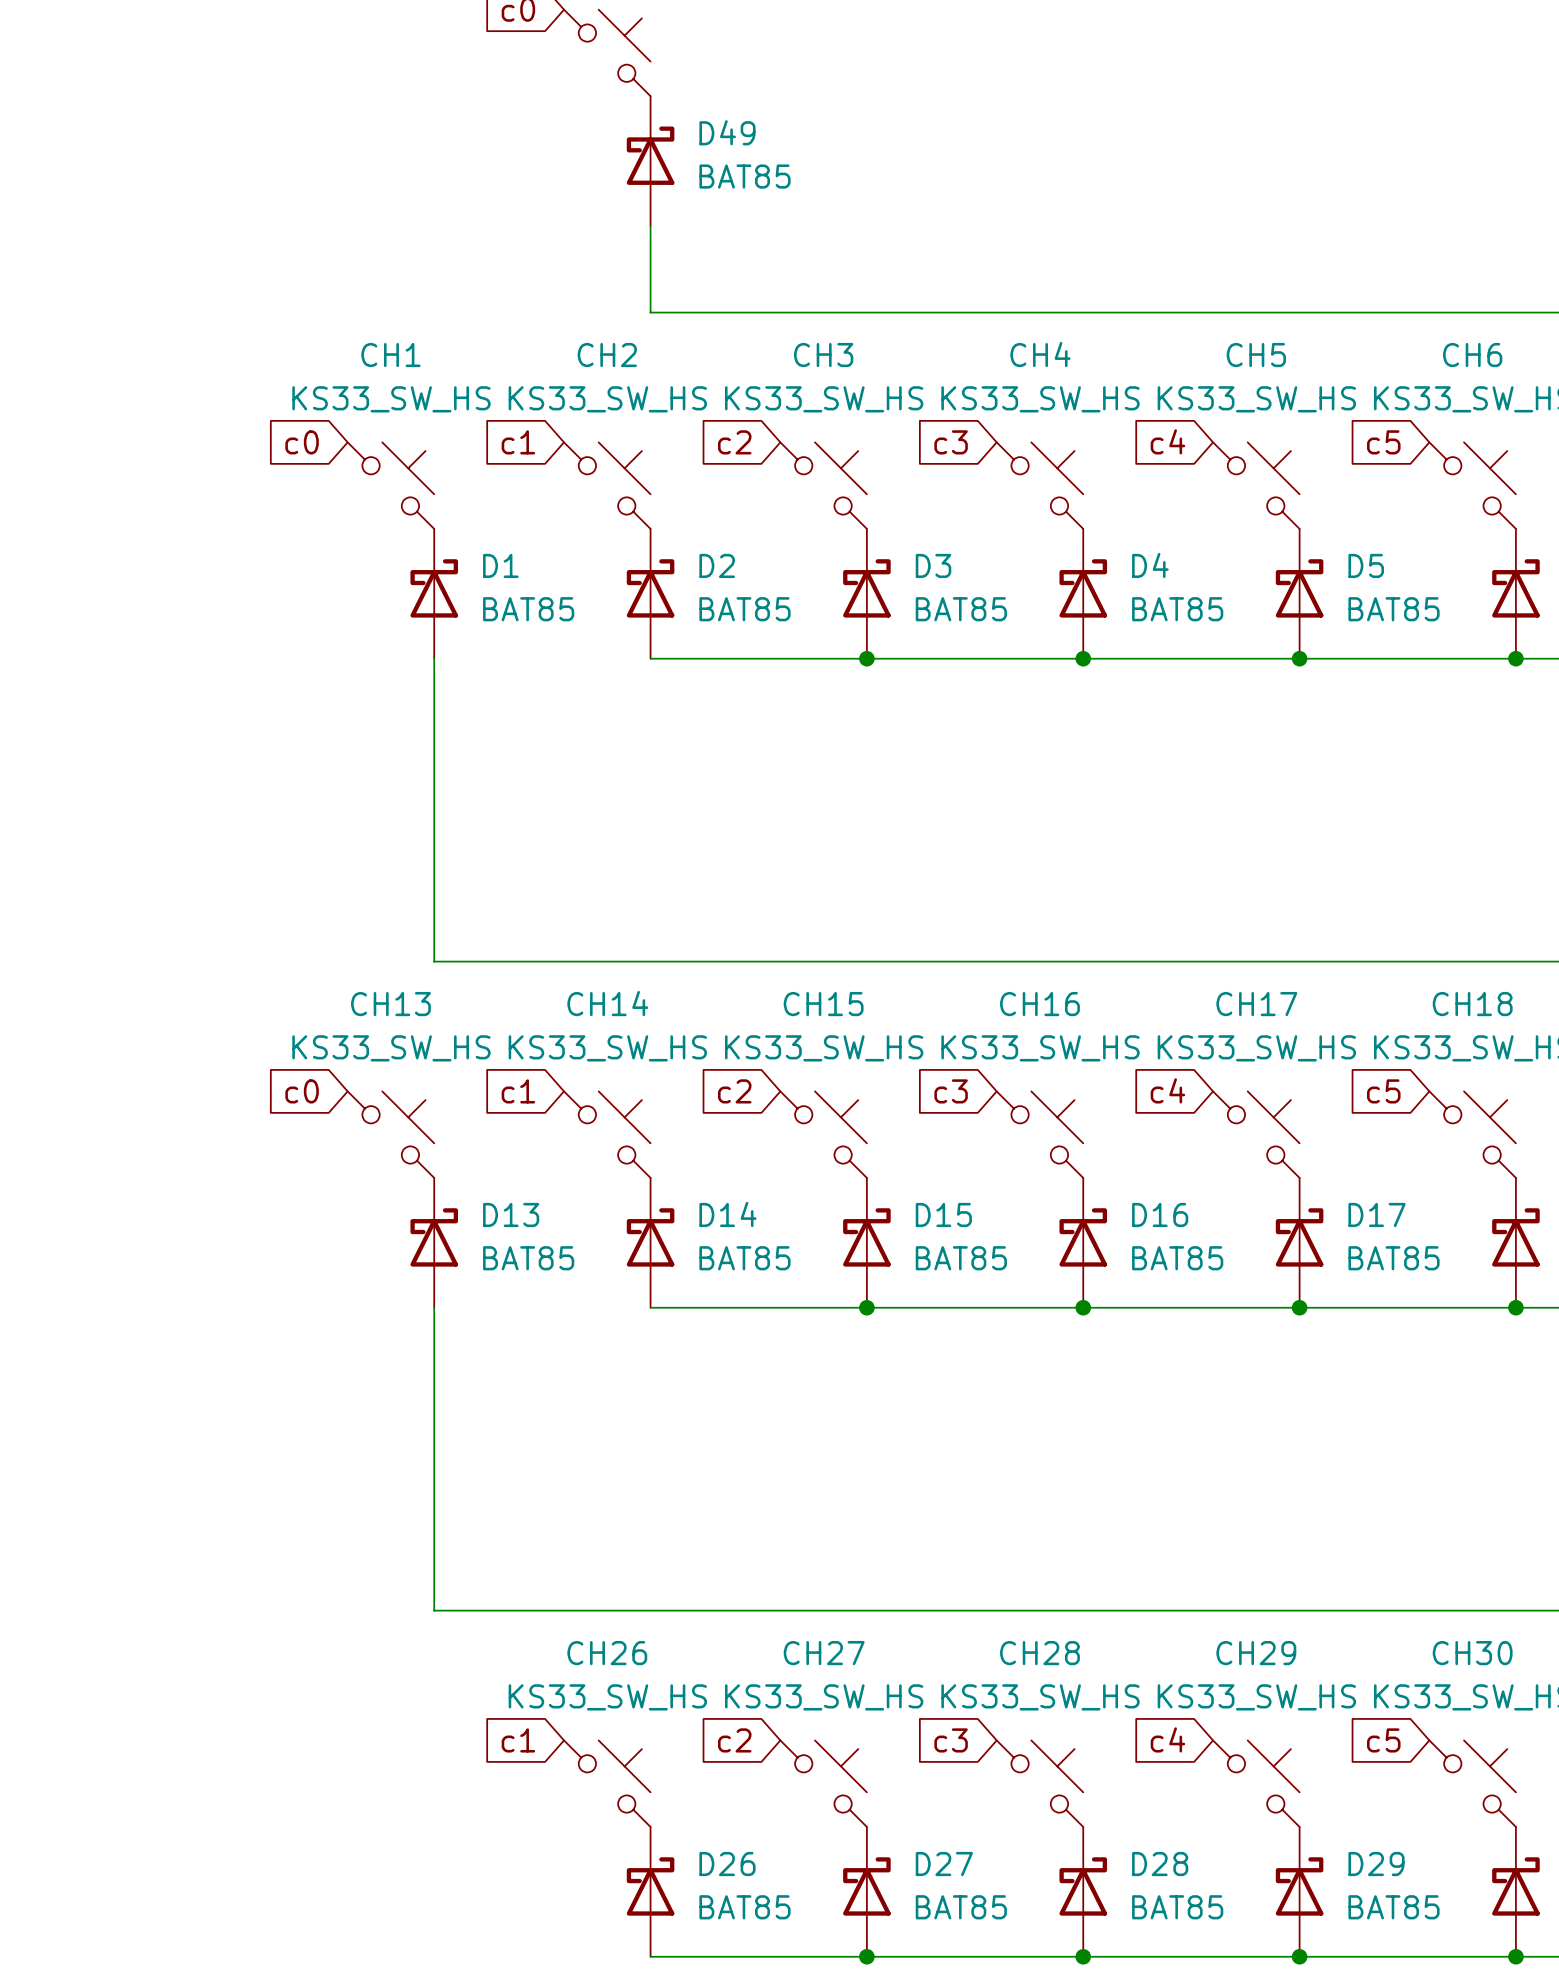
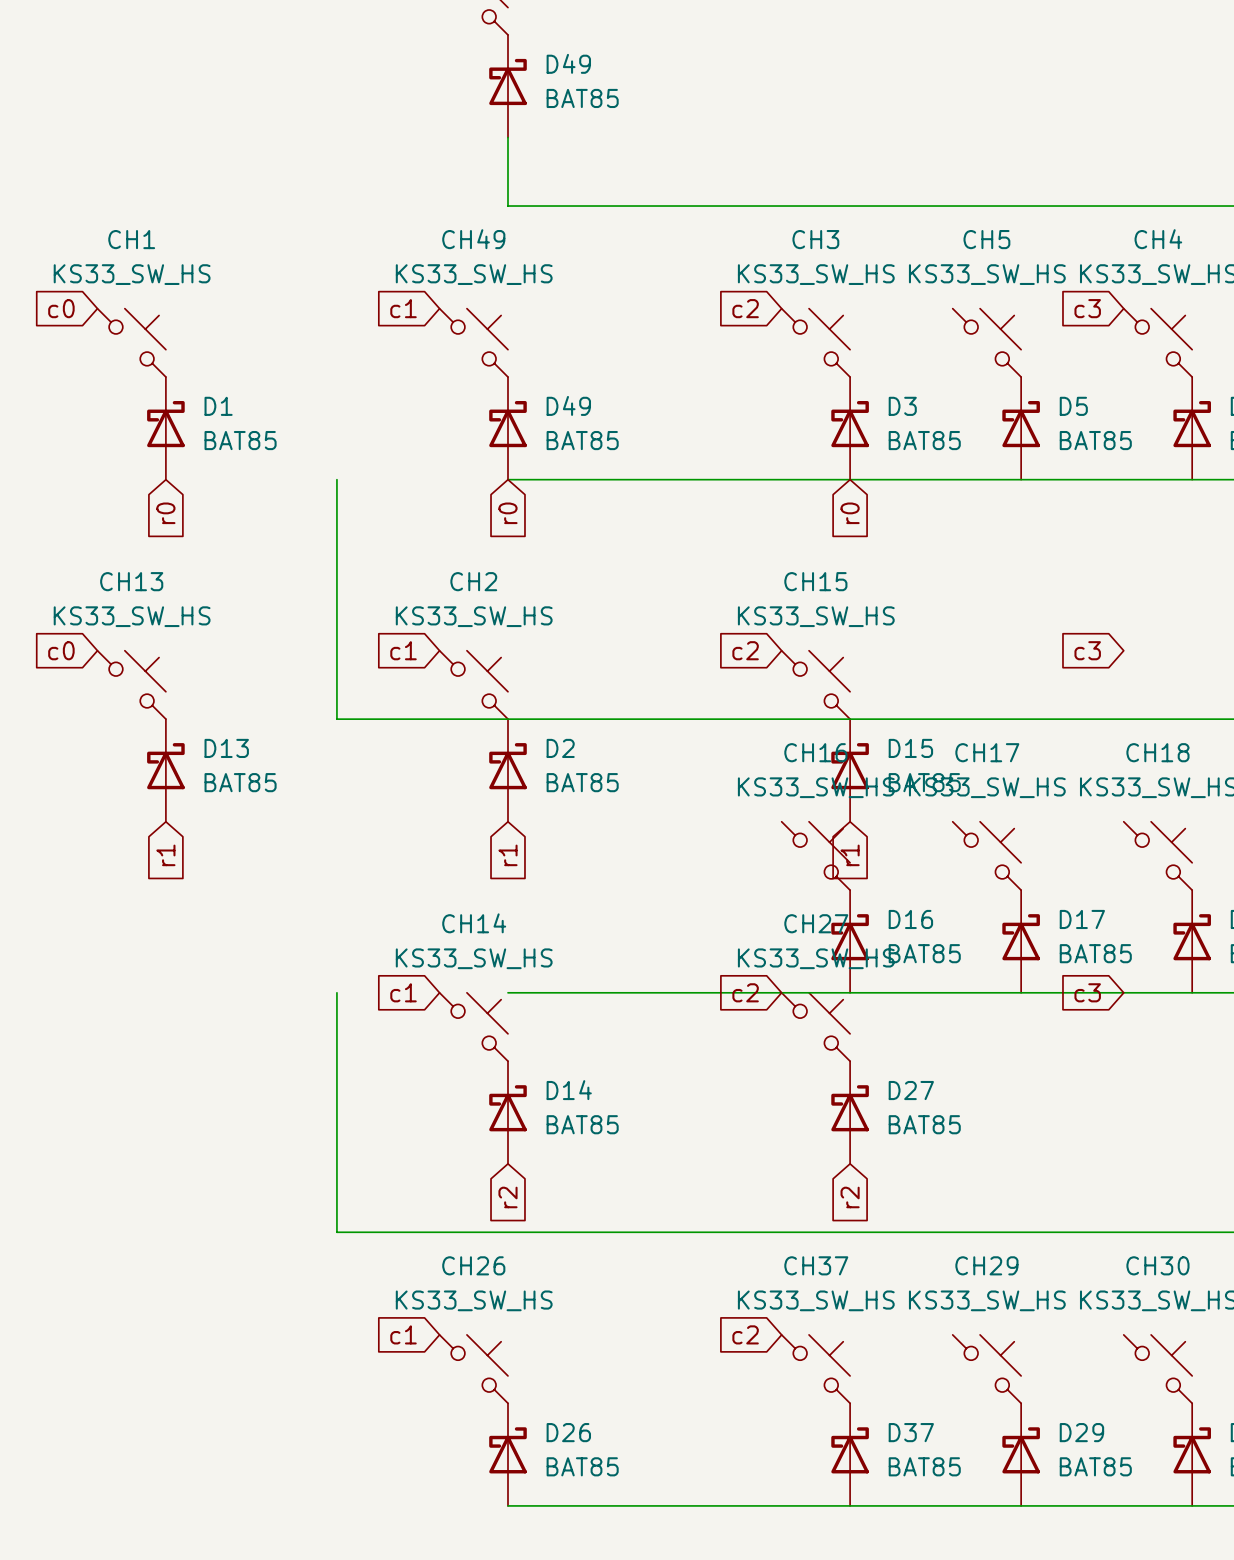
CH4 name: CH4 (1040, 354) -> CH3 (815, 239)
CH2 name: CH2 (607, 355) -> CH49 (473, 239)
CH6 name: CH6 (1472, 355) -> CH4 (1158, 239)
global label: c4 (1167, 441) -> none
global label position: c0 (302, 442) -> c0 (61, 308)
global label: c2 (734, 442) -> none
global label: c3 (951, 442) -> c2 (745, 308)
global label: c5 (1383, 442) -> c3 (1087, 308)
CH1 position: (390, 485) -> (131, 342)
CH3: KS33_SW_HS (823, 485) -> none
D2 name: D2 (717, 565) -> D49 (568, 405)
D4 name: D4 (1150, 565) -> D3 (902, 406)
D1 position: (434, 593) -> (165, 428)
D3: BAT85 (866, 593) -> none
junction: (866, 658) -> none
junction: (1083, 658) -> none
junction: (1299, 658) -> none
junction: (1515, 658) -> none
global label: none -> r0 (165, 513)
global label: none -> r0 (507, 513)
global label: none -> r0 (850, 513)
global label: none -> c0 (61, 650)
global label: none -> c1 (403, 650)
global label: none -> c2 (745, 650)
global label: none -> c3 (1087, 650)
CH2: none -> KS33_SW_HS (473, 684)
D2: none -> BAT85 (507, 770)
global label: c4 (1167, 1090) -> none
global label: c0 (302, 1091) -> none
global label: c1 (518, 1091) -> none
global label: c2 (734, 1091) -> none
global label: c3 (951, 1091) -> none
global label: c5 (1383, 1091) -> none
global label: none -> r1 (165, 855)
global label: none -> r1 (507, 855)
global label: none -> r1 (850, 855)
CH13 position: (390, 1134) -> (131, 684)
CH14 position: (607, 1134) -> (473, 1027)
CH15 position: (823, 1134) -> (815, 684)
D13 position: (434, 1242) -> (165, 770)
D14 position: (650, 1242) -> (507, 1112)
D15 position: (866, 1242) -> (850, 770)
global label: none -> c1 (403, 992)
junction: (866, 1307) -> none
global label: none -> c2 (745, 992)
junction: (1083, 1307) -> none
junction: (1299, 1307) -> none
global label: none -> c3 (1087, 992)
junction: (1515, 1307) -> none
global label: none -> r2 (507, 1197)
global label: none -> r2 (850, 1197)
CH28 name: CH28 (1039, 1653) -> CH37 (816, 1265)
global label: c4 (1167, 1739) -> none
global label: c2 (734, 1740) -> none
global label: c3 (951, 1740) -> c2 (745, 1334)
global label: c5 (1383, 1740) -> none
CH27 position: (823, 1783) -> (815, 1027)
D28 name: D28 (1160, 1864) -> D37 (911, 1432)
D27 position: (866, 1891) -> (850, 1112)
junction: (866, 1956) -> none
junction: (1083, 1956) -> none
junction: (1299, 1956) -> none
junction: (1515, 1956) -> none

